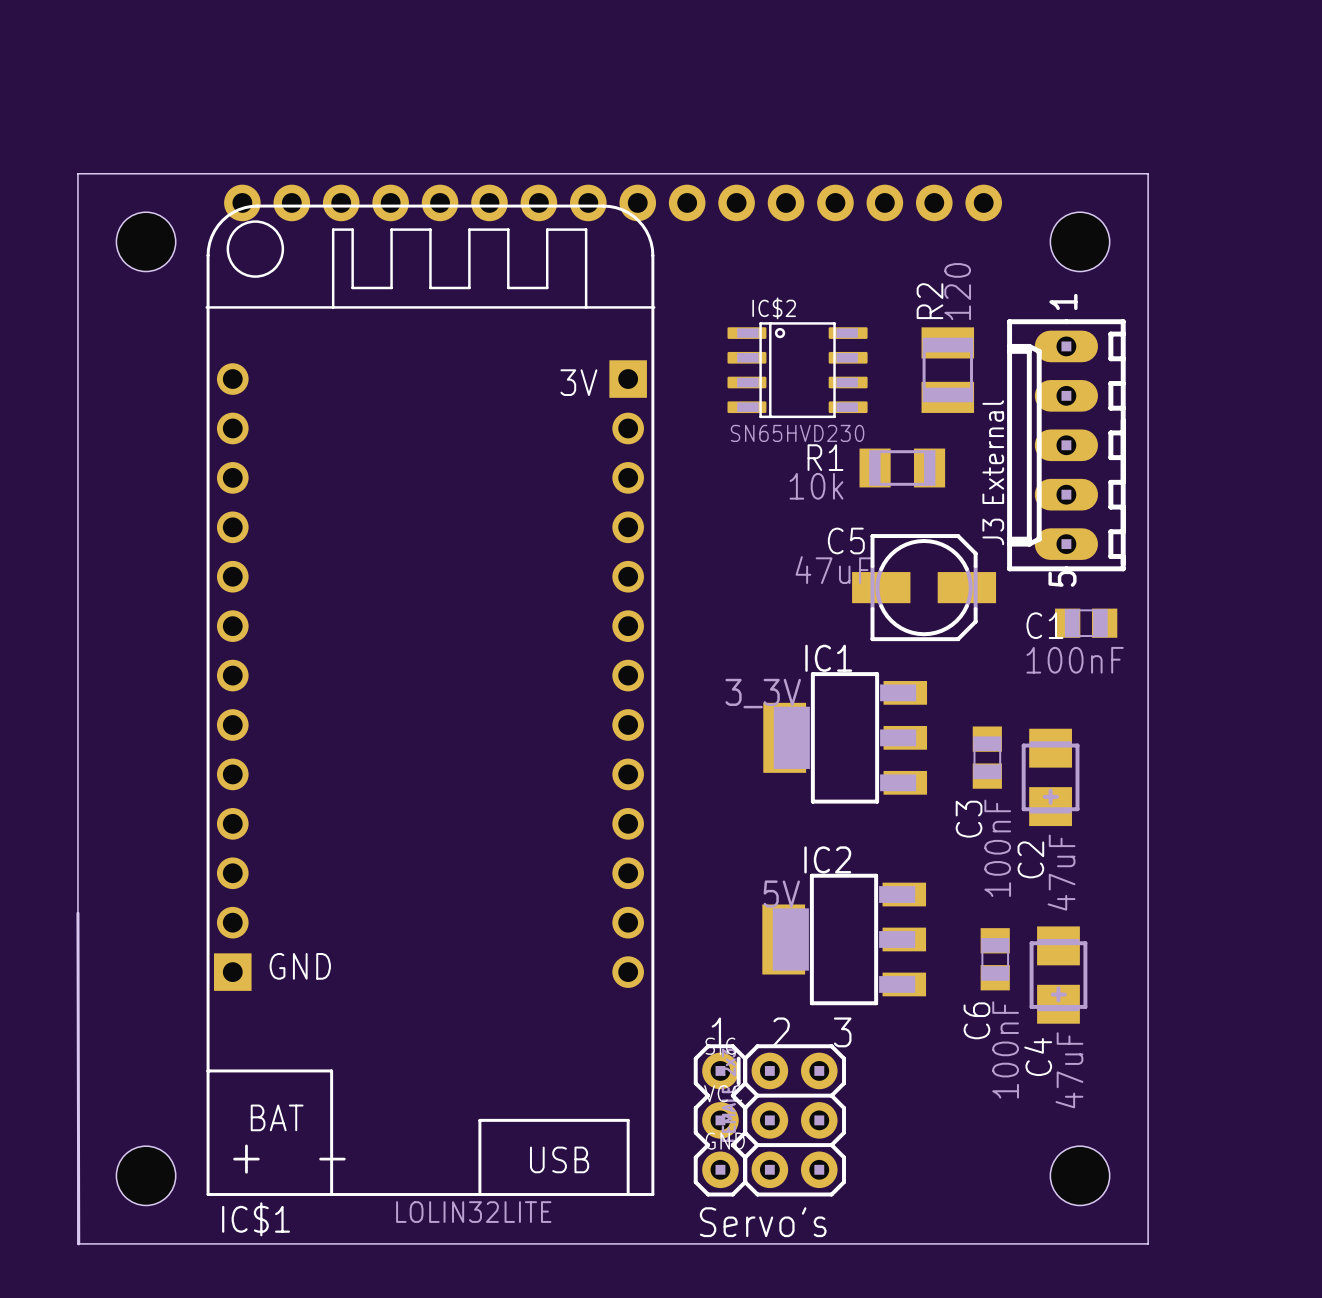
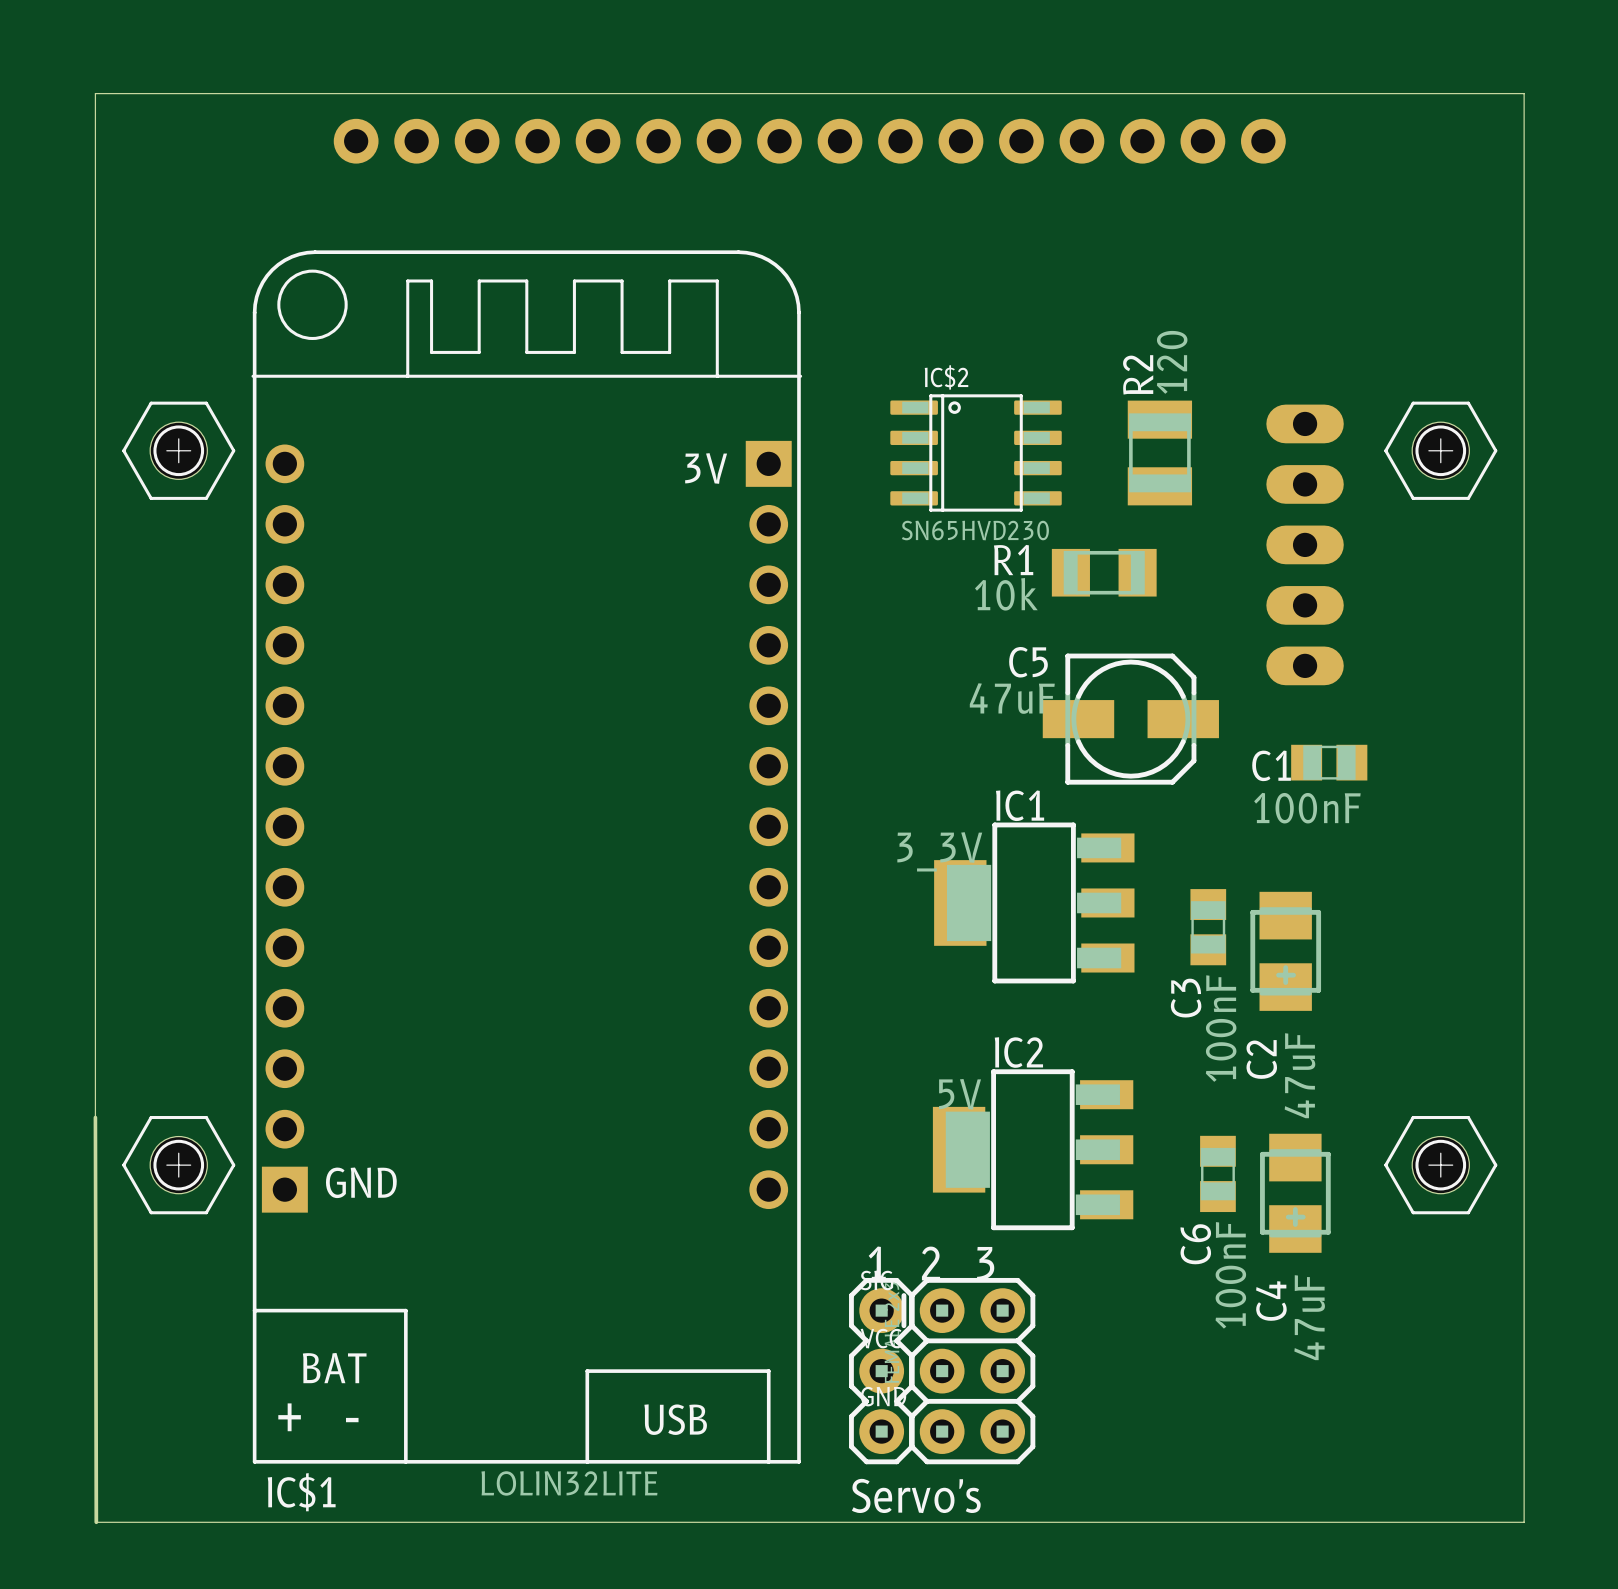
board edge: (77, 173) (1148, 173) (1148, 1243) -> (95, 212) (95, 93) (1524, 93) (1524, 1522) (1405, 1522)
part position: (613, 202) -> (809, 141)
part: (146, 241) -> none
part: (1080, 241) -> none
part: none -> (178, 450)
part: none -> (1440, 450)
J3 side: top (1066, 445) -> bottom (1305, 544)
part: none -> (178, 1165)
part: none -> (1440, 1165)
part: (146, 1175) -> none
part: (1080, 1175) -> none

